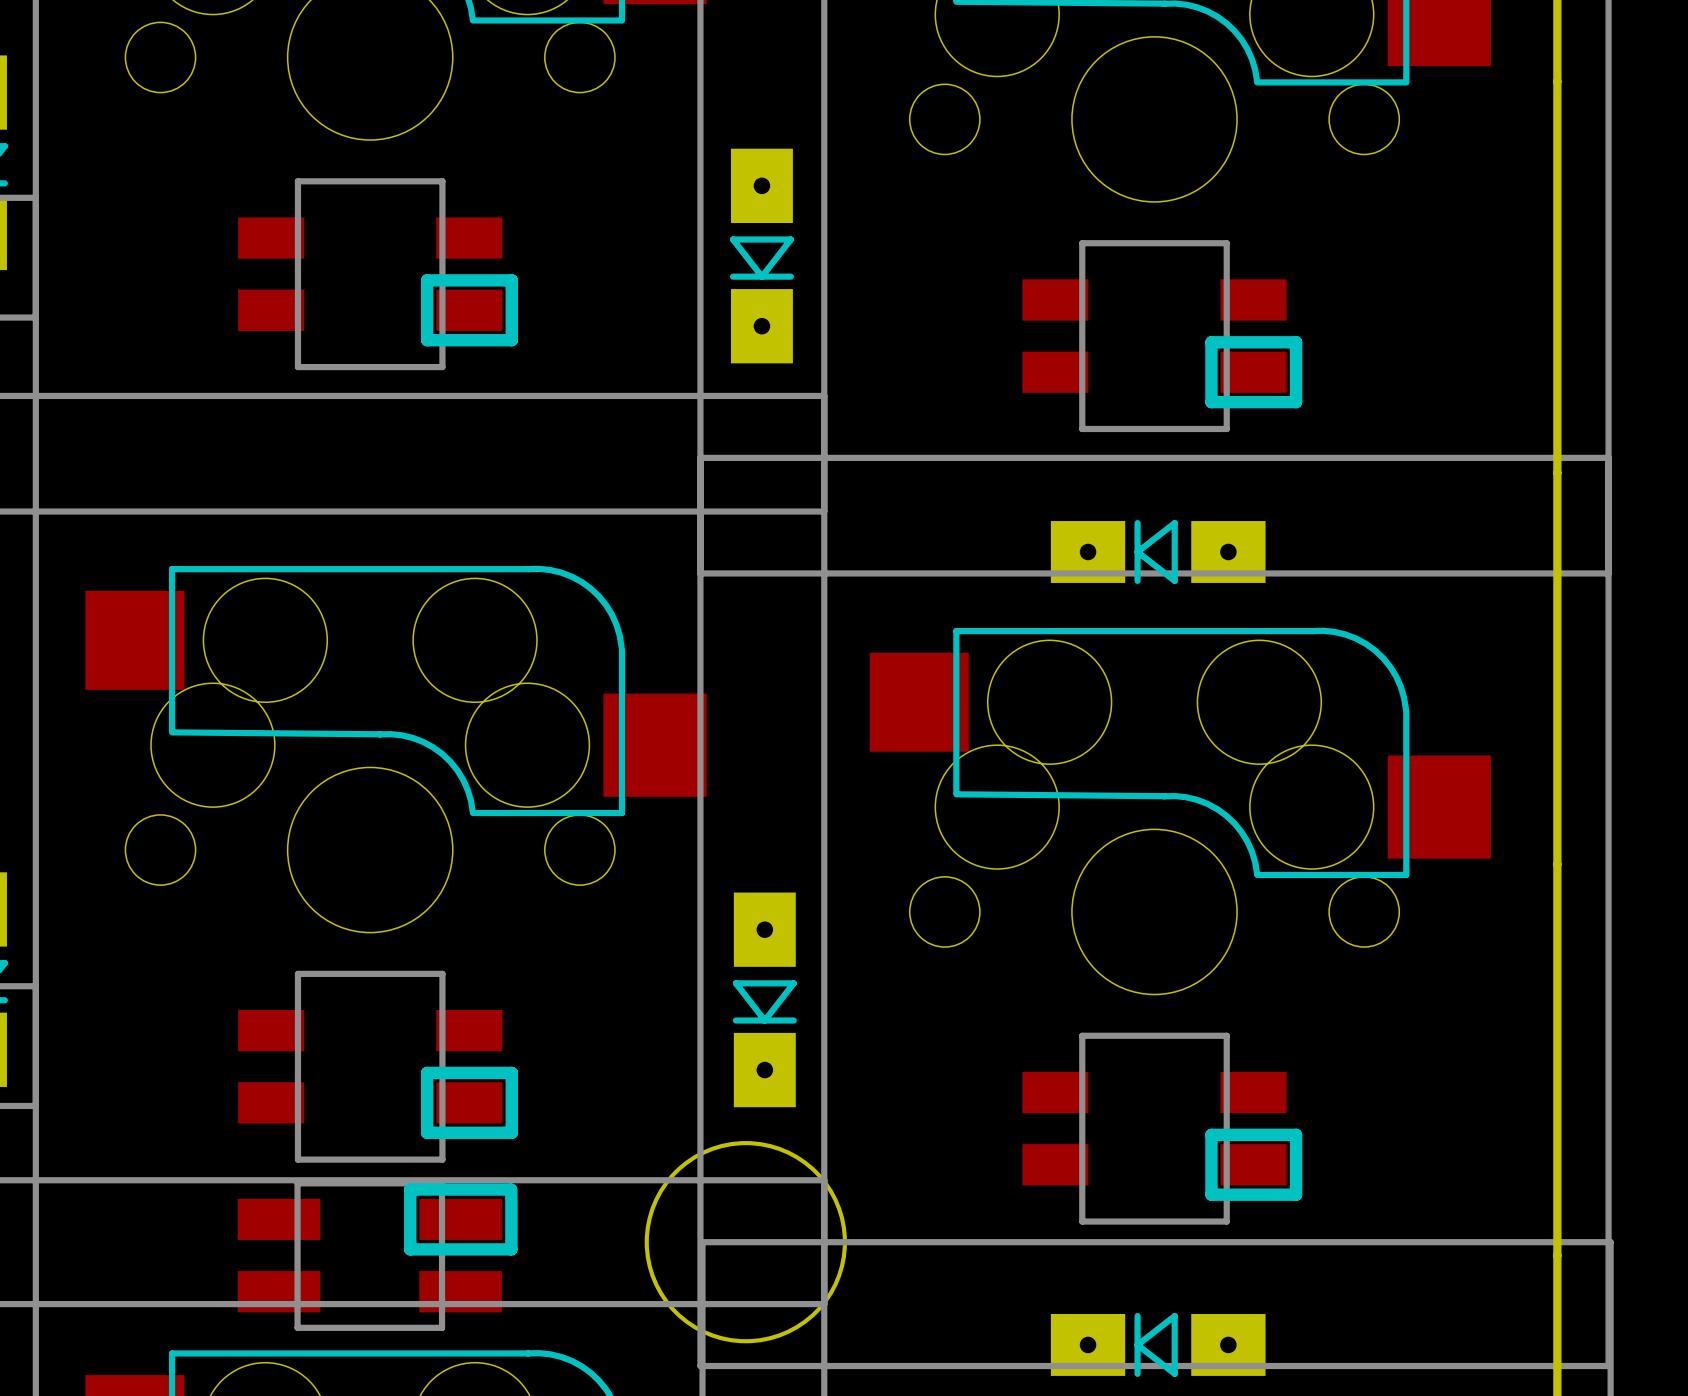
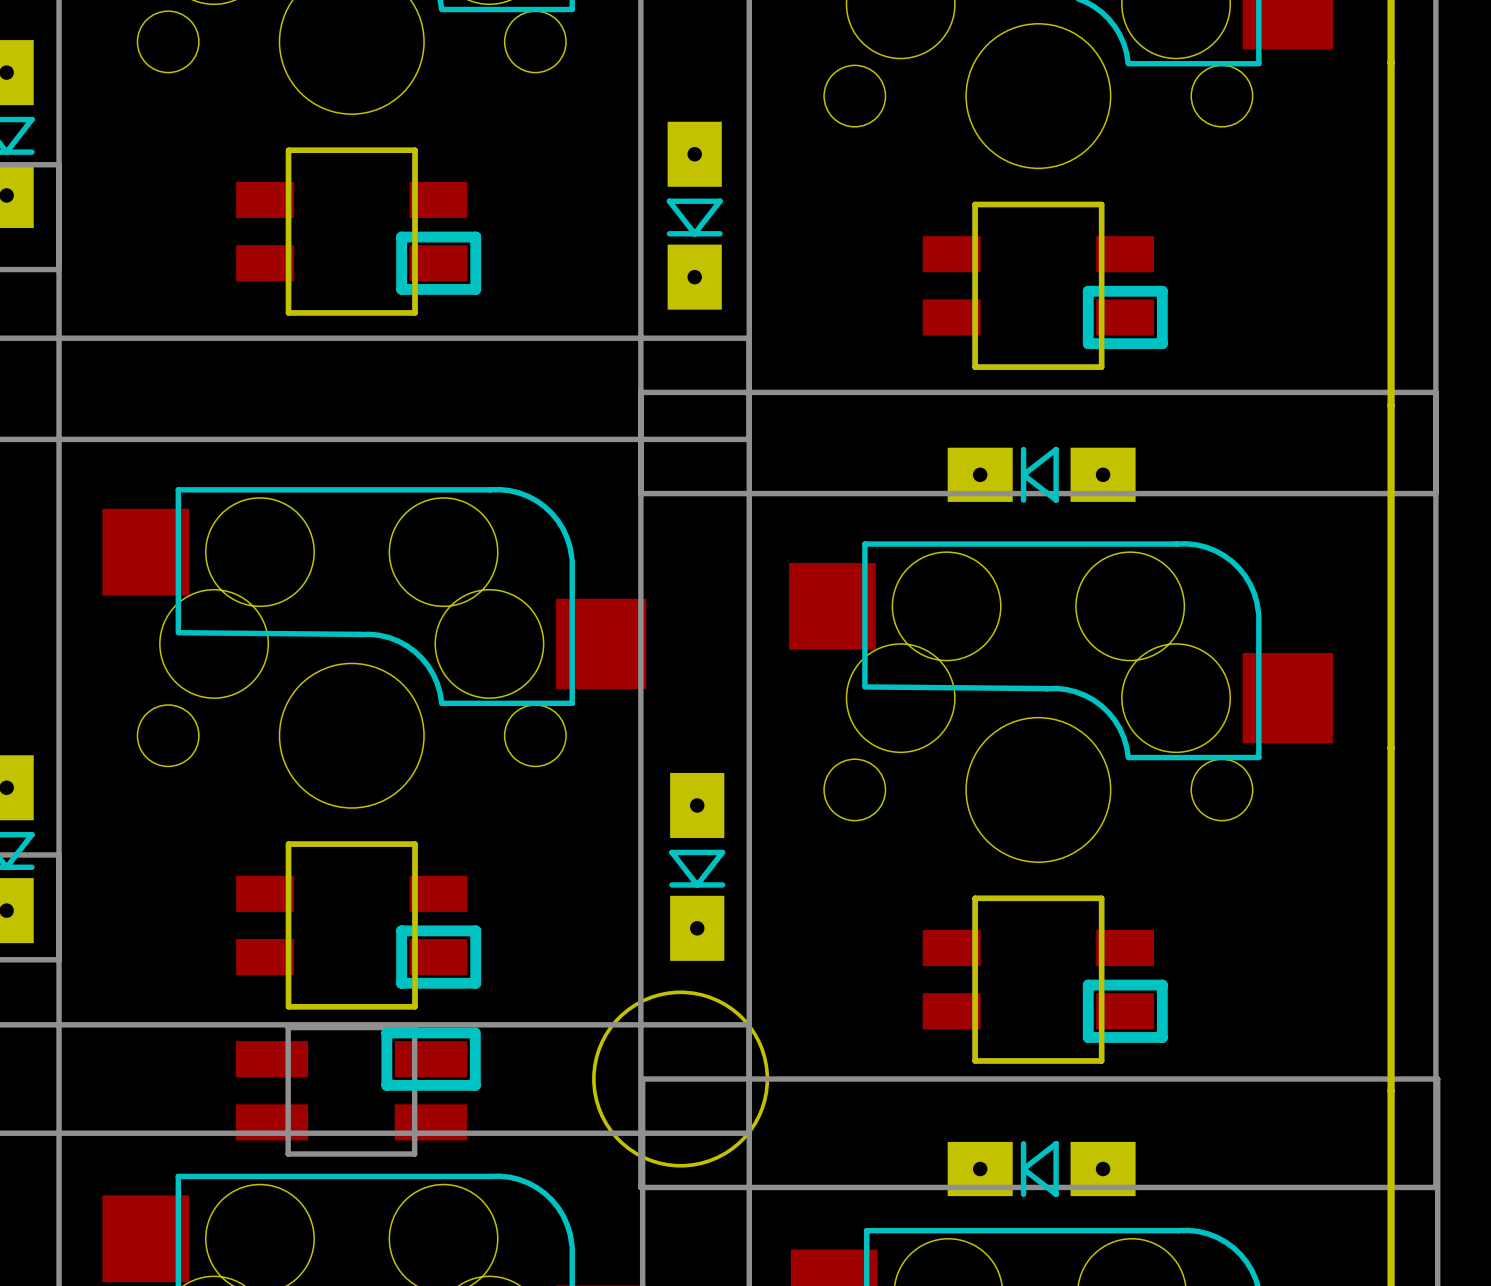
board edge: none -> (288, 150) (288, 312) (415, 312) (415, 150) (288, 150)
board edge: none -> (975, 204) (975, 367) (1101, 367) (1101, 204) (975, 204)
board edge: none -> (288, 844) (288, 1006) (415, 1006) (415, 844) (288, 844)
board edge: none -> (975, 898) (975, 1060) (1101, 1060) (1101, 898) (975, 898)

